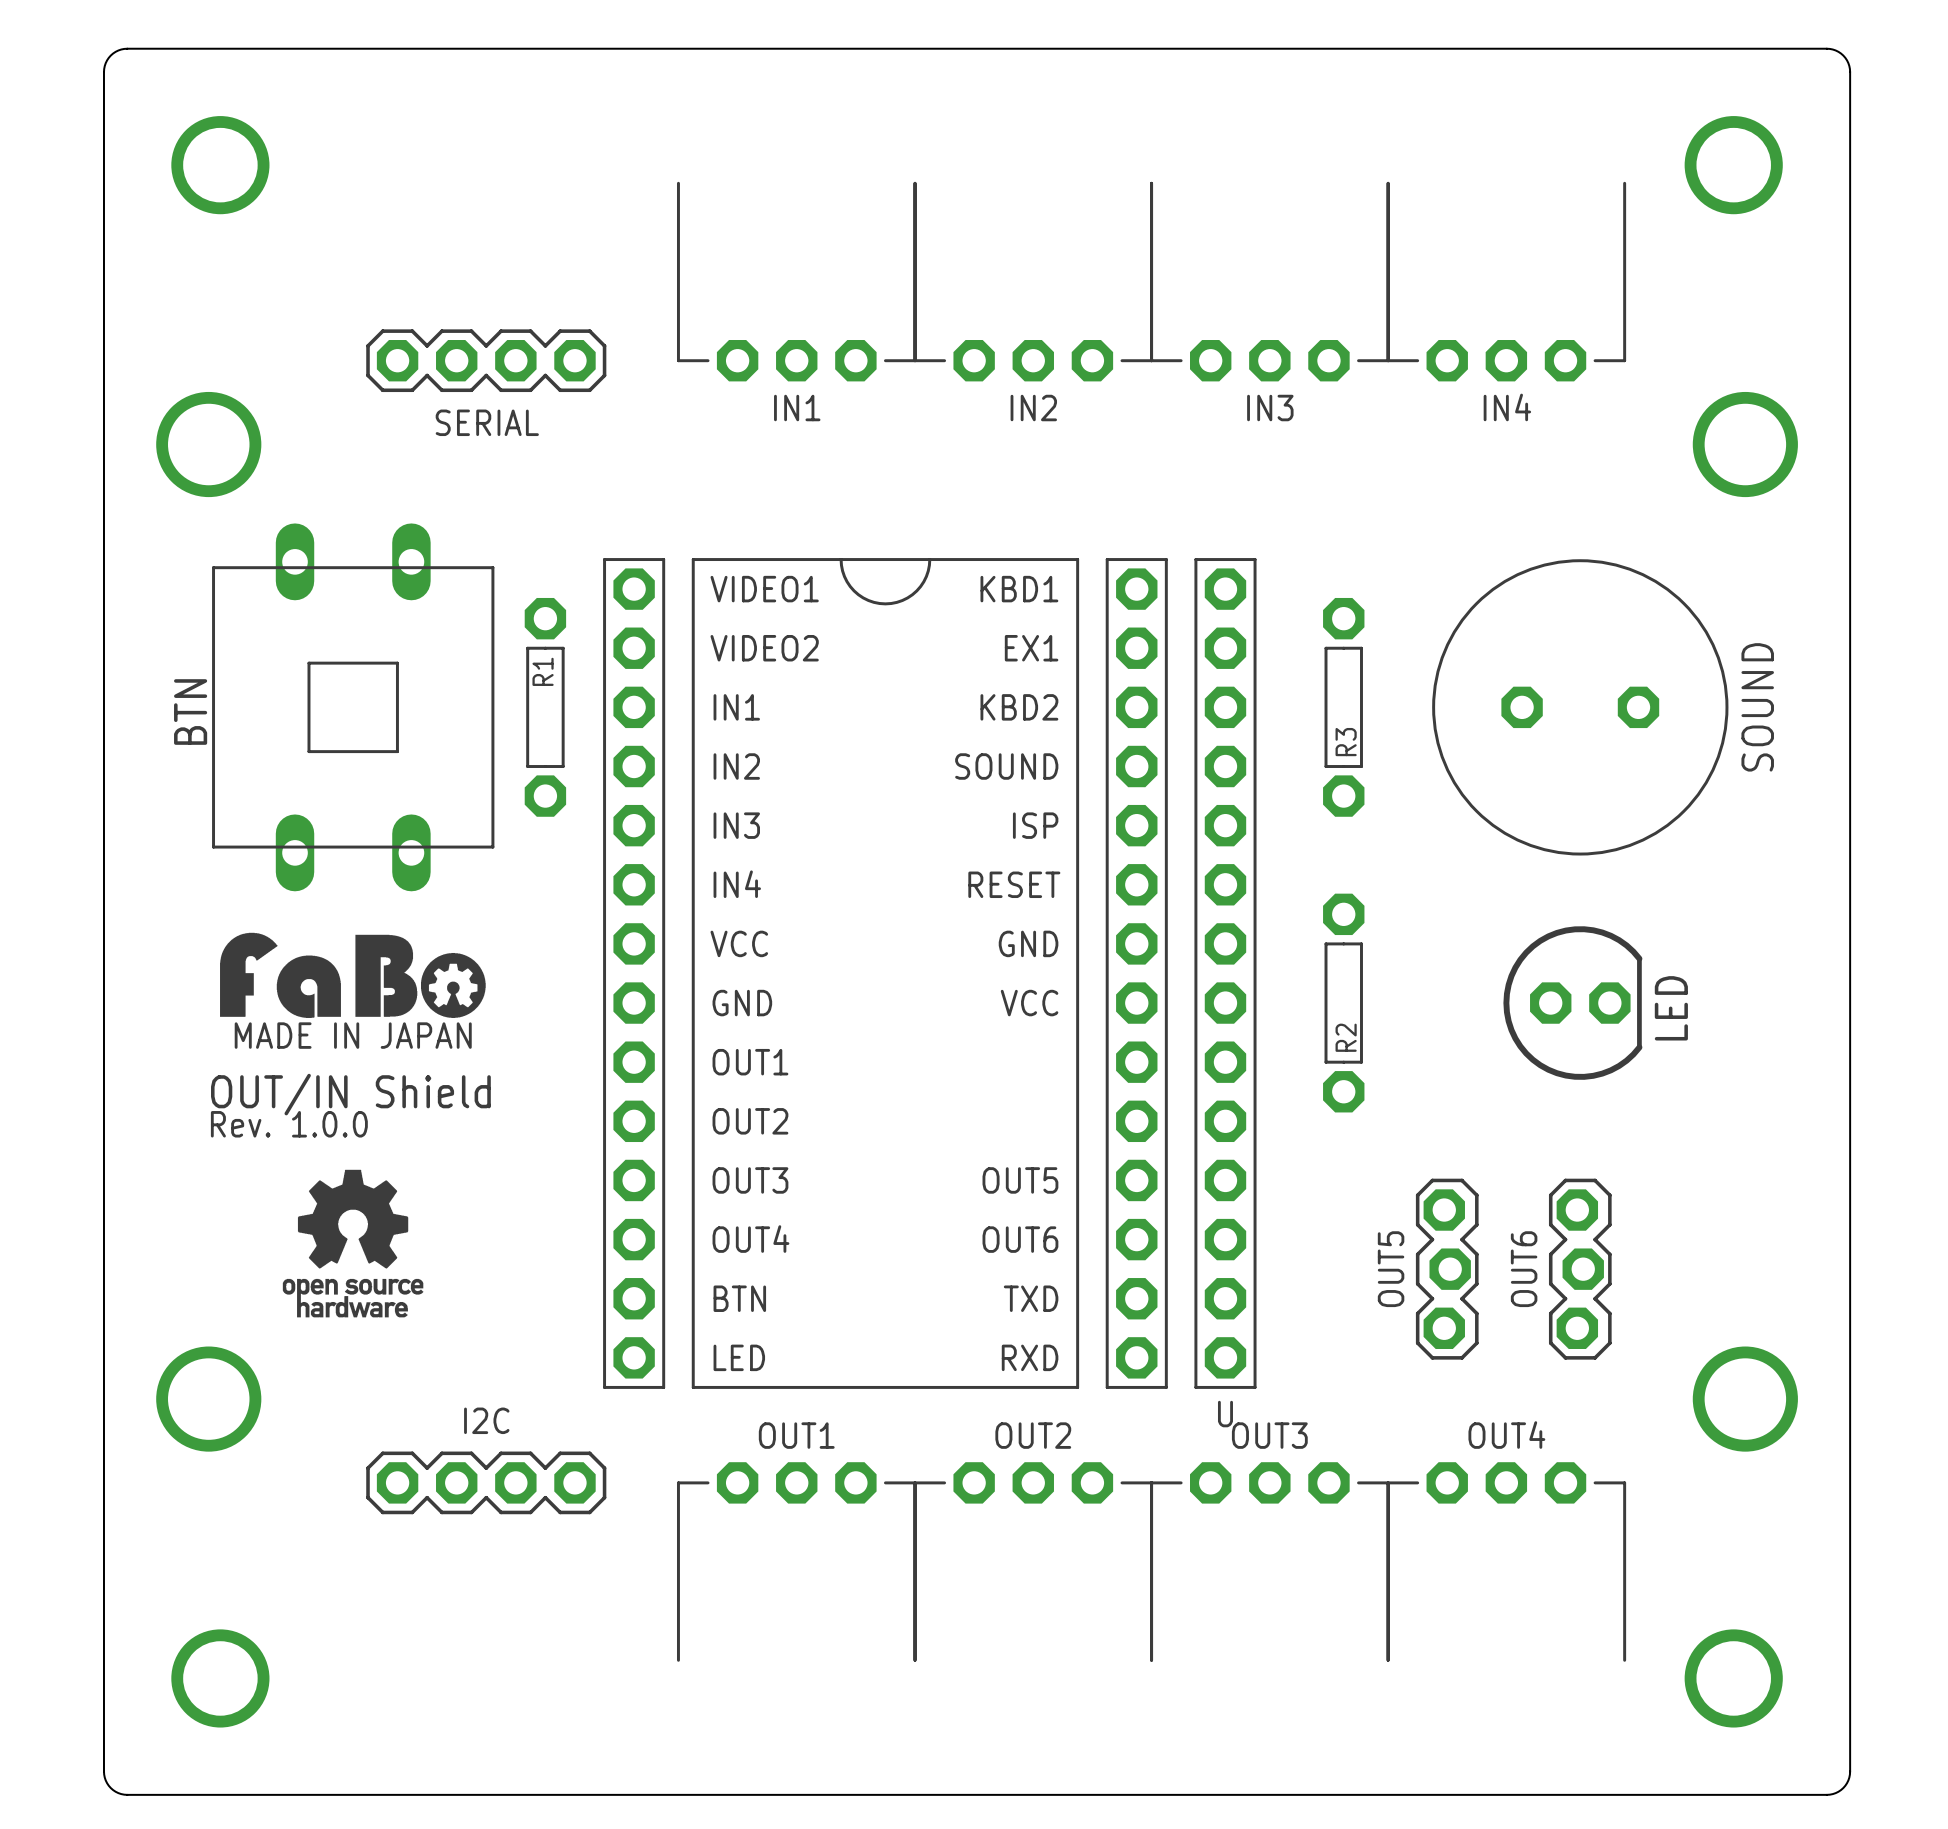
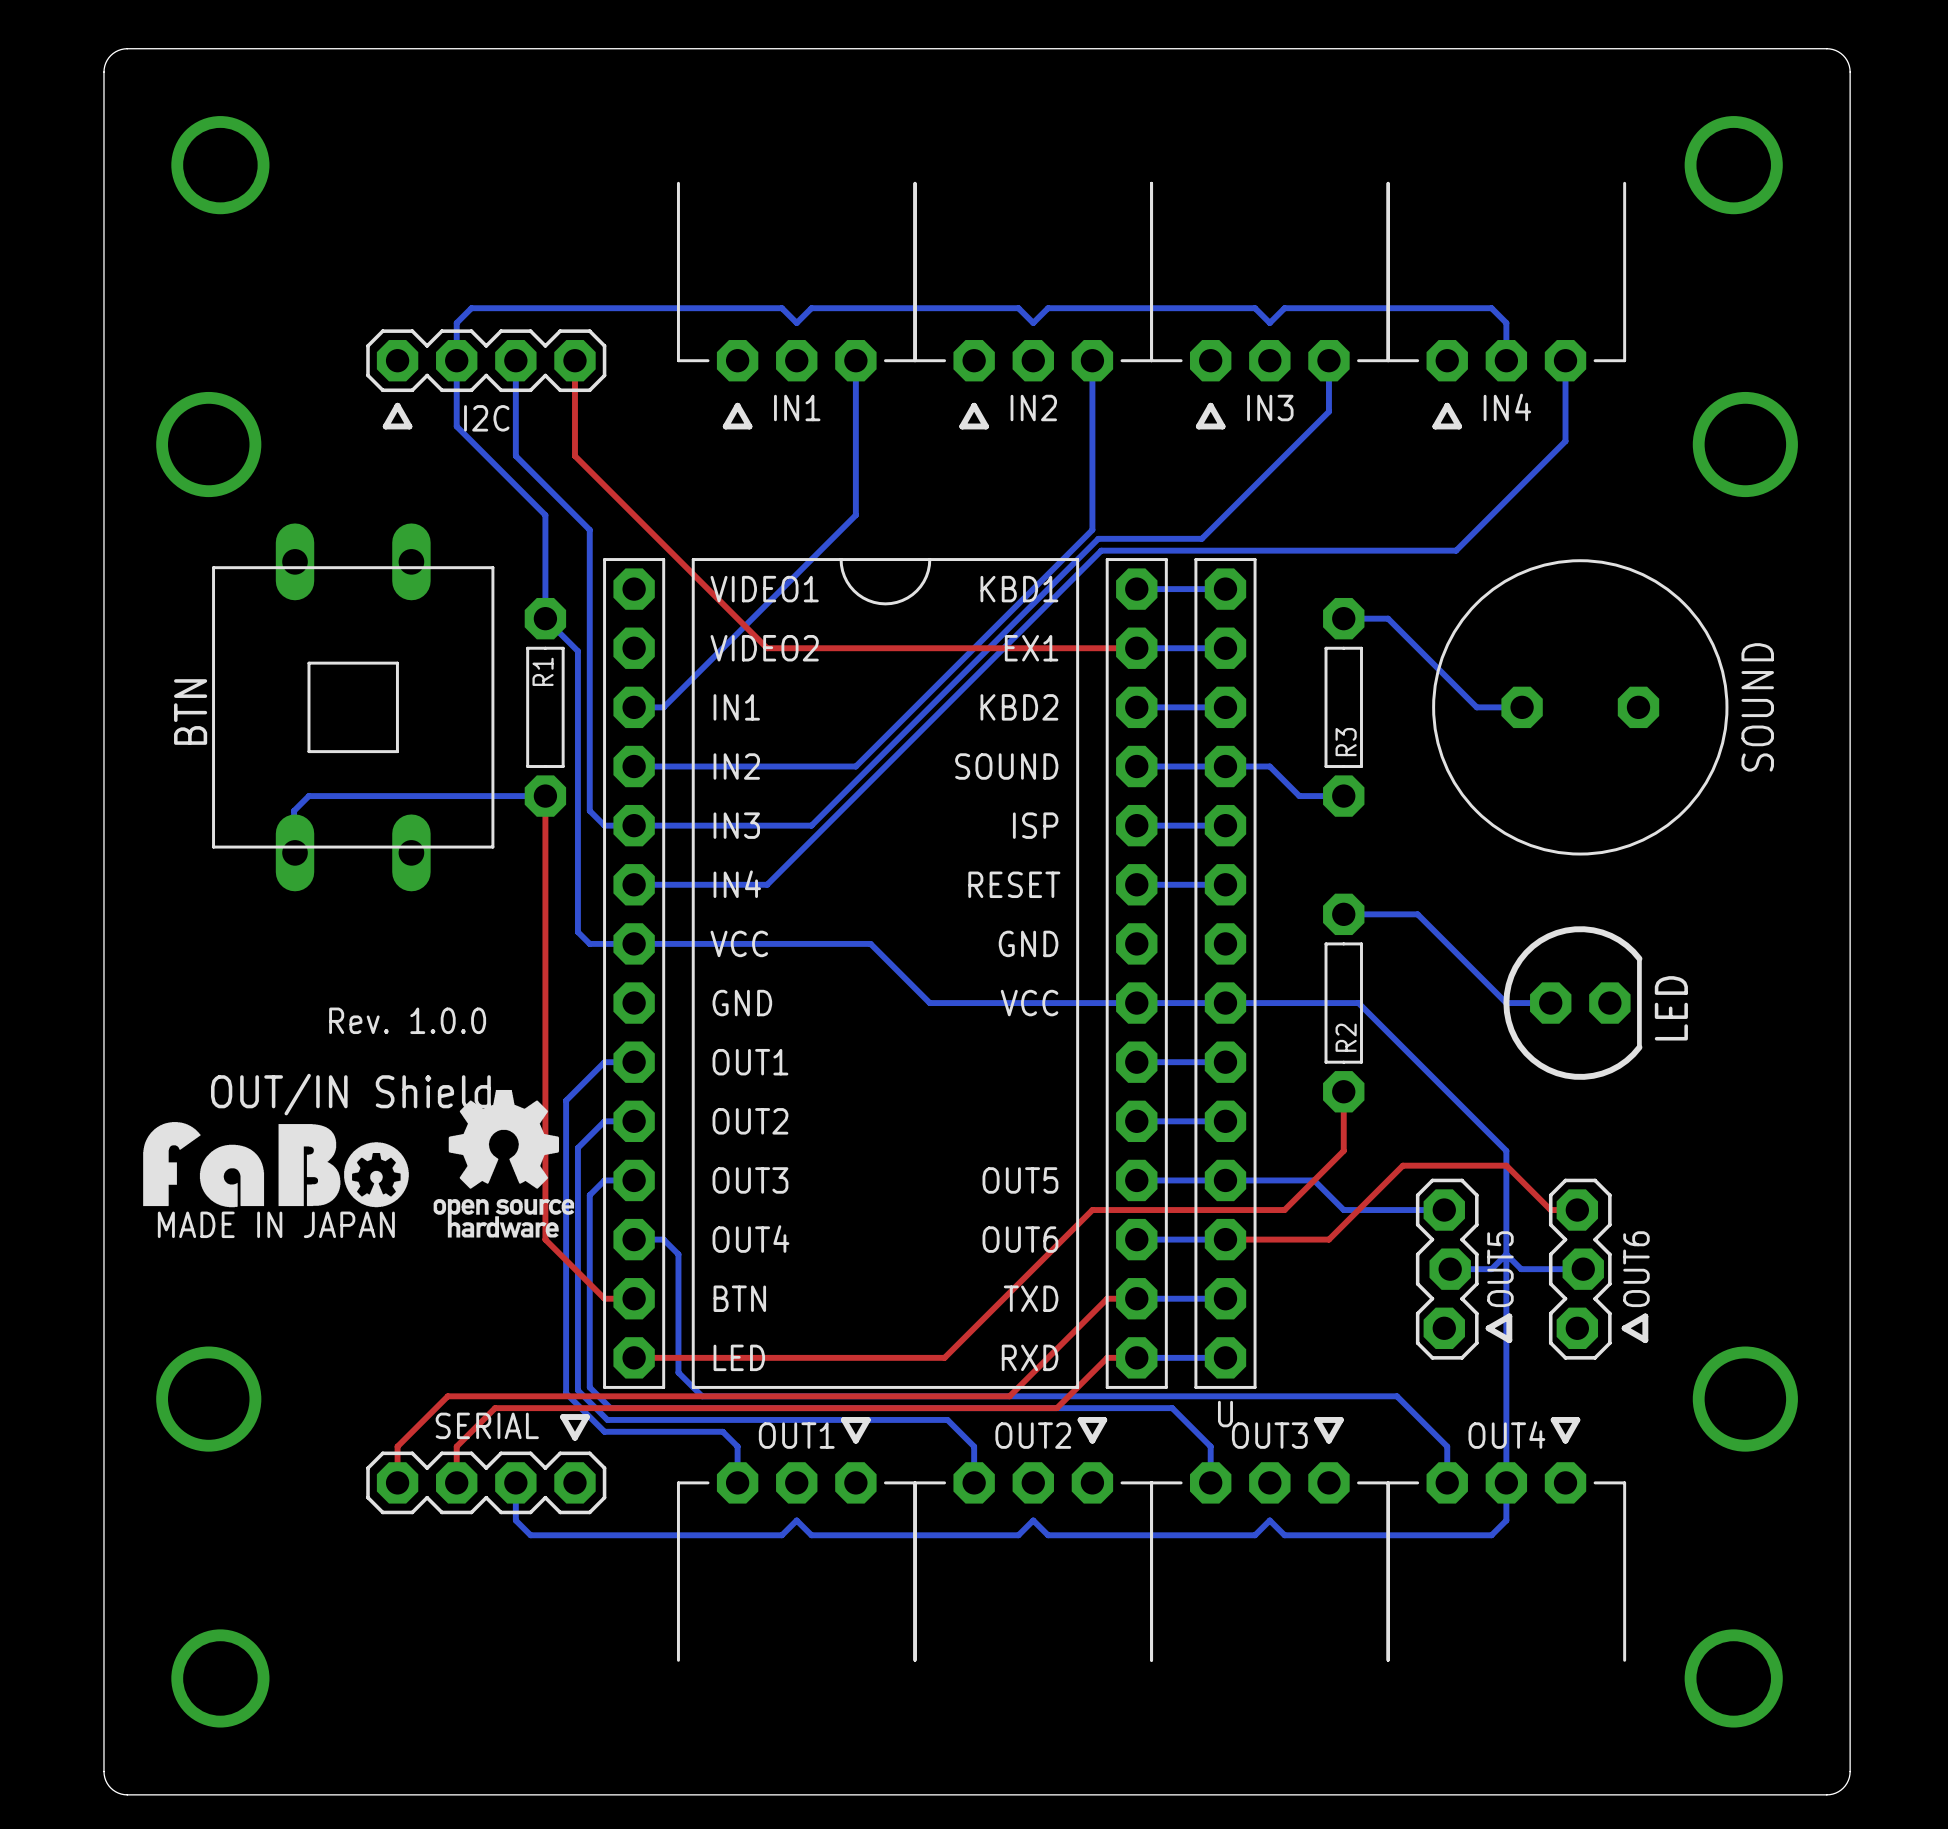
bottom track: none -> (515, 360) (515, 456) (589, 529) (589, 810) (604, 825) (811, 825) (1098, 538) (1201, 538) (1328, 411) (1328, 360)
top track: none -> (574, 360) (574, 456) (767, 648) (1136, 648)
bottom track: none -> (855, 360) (855, 515) (663, 707) (634, 707)
bottom track: none -> (1092, 360) (1092, 529) (855, 766) (634, 766)
bottom track: none -> (1506, 360) (1506, 322) (1491, 308) (1284, 308) (1269, 322) (1255, 308) (1048, 308) (1033, 322) (1018, 308) (811, 308) (796, 322) (781, 308) (471, 308) (456, 322) (456, 426) (545, 515) (545, 618) (577, 651) (577, 932) (589, 943) (870, 943) (929, 1003) (1358, 1003) (1506, 1150) (1506, 1520) (1491, 1535) (1284, 1535) (1269, 1520) (1255, 1535) (1048, 1535) (1033, 1520) (1018, 1535) (811, 1535) (796, 1520) (781, 1535) (530, 1535) (515, 1520) (515, 1482)
bottom track: none -> (1565, 360) (1565, 441) (1456, 550) (1101, 550) (767, 884) (634, 884)
line: none -> (397, 405) (385, 426) (409, 426) (397, 405)
line: none -> (737, 405) (725, 426) (749, 426) (737, 405)
line: none -> (974, 405) (962, 426) (985, 426) (974, 405)
line: none -> (1210, 405) (1198, 426) (1222, 426) (1210, 405)
line: none -> (1447, 405) (1435, 426) (1459, 426) (1447, 405)
SERIAL name: SERIAL (487, 422) -> I2C (486, 418)
bottom track: none -> (1136, 589) (1225, 589)
bottom track: none -> (1343, 618) (1388, 618) (1476, 707) (1522, 707)
bottom track: none -> (1136, 648) (1225, 648)
bottom track: none -> (1136, 707) (1225, 707)
bottom track: none -> (1136, 766) (1269, 766) (1299, 796) (1343, 796)
bottom track: none -> (545, 796) (308, 796) (294, 810) (295, 852)
top track: none -> (545, 796) (545, 1239) (604, 1298) (634, 1298)
bottom track: none -> (1136, 825) (1225, 825)
bottom track: none -> (1136, 884) (1225, 884)
bottom track: none -> (1343, 914) (1417, 914) (1506, 1003) (1550, 1003)
drawing position: (352, 975) -> (275, 1164)
text position: MADE IN JAPAN (353, 1035) -> MADE IN JAPAN (276, 1224)
bottom track: none -> (634, 1062) (604, 1062) (566, 1100) (566, 1393) (604, 1431) (722, 1431) (737, 1446) (737, 1482)
bottom track: none -> (1136, 1062) (1225, 1062)
top track: none -> (1343, 1091) (1343, 1150) (1284, 1210) (1092, 1210) (944, 1357) (634, 1357)
bottom track: none -> (634, 1121) (604, 1121) (577, 1147) (577, 1390) (607, 1419) (947, 1419) (974, 1446) (974, 1482)
bottom track: none -> (1136, 1121) (1225, 1121)
text position: Rev. 1.0.0 (289, 1124) -> Rev. 1.0.0 (407, 1020)
bottom track: none -> (634, 1180) (604, 1180) (589, 1195) (589, 1387) (610, 1408) (1172, 1408) (1210, 1446) (1210, 1482)
bottom track: none -> (1136, 1180) (1314, 1180) (1343, 1210) (1444, 1210)
top track: none -> (1577, 1210) (1550, 1210) (1506, 1165) (1402, 1165) (1328, 1239) (1225, 1239)
bottom track: none -> (634, 1239) (663, 1239) (678, 1254) (678, 1372) (702, 1396) (1396, 1396) (1447, 1446) (1447, 1482)
bottom track: none -> (1136, 1239) (1225, 1239)
drawing position: (353, 1243) -> (503, 1163)
OUT5 name position: OUT5 (1391, 1269) -> OUT5 (1500, 1269)
bottom track: none -> (1450, 1269) (1491, 1269) (1506, 1254) (1521, 1269) (1583, 1269)
OUT6 name position: OUT6 (1524, 1269) -> OUT6 (1636, 1269)
bottom track: none -> (1136, 1298) (1225, 1298)
top track: none -> (1136, 1298) (1107, 1298) (1009, 1396) (447, 1396) (397, 1446) (397, 1482)
line: none -> (1509, 1316) (1509, 1340) (1488, 1328) (1509, 1316)
line: none -> (1645, 1316) (1645, 1340) (1624, 1328) (1645, 1316)
bottom track: none -> (1136, 1357) (1225, 1357)
top track: none -> (1136, 1357) (1107, 1357) (1056, 1408) (495, 1408) (456, 1446) (456, 1482)
line: none -> (563, 1417) (586, 1417) (574, 1437) (563, 1417)
line: none -> (844, 1419) (867, 1419) (855, 1440) (844, 1419)
line: none -> (1080, 1419) (1104, 1419) (1092, 1440) (1080, 1419)
line: none -> (1317, 1419) (1328, 1440) (1340, 1419) (1317, 1419)
line: none -> (1553, 1419) (1565, 1440) (1577, 1419) (1553, 1419)
I2C name: I2C (486, 1420) -> SERIAL (487, 1425)

